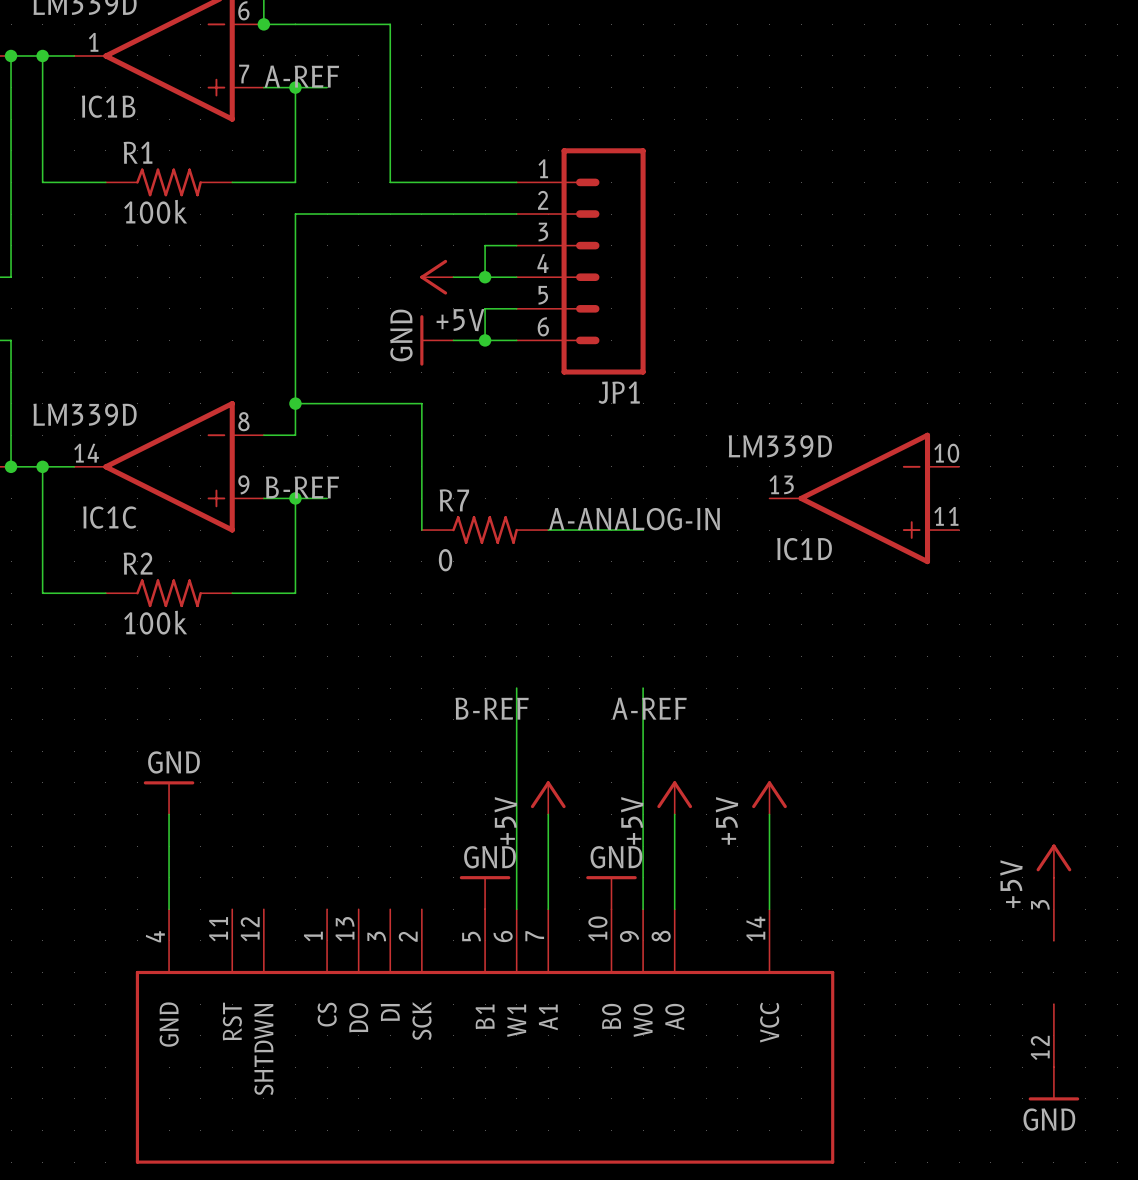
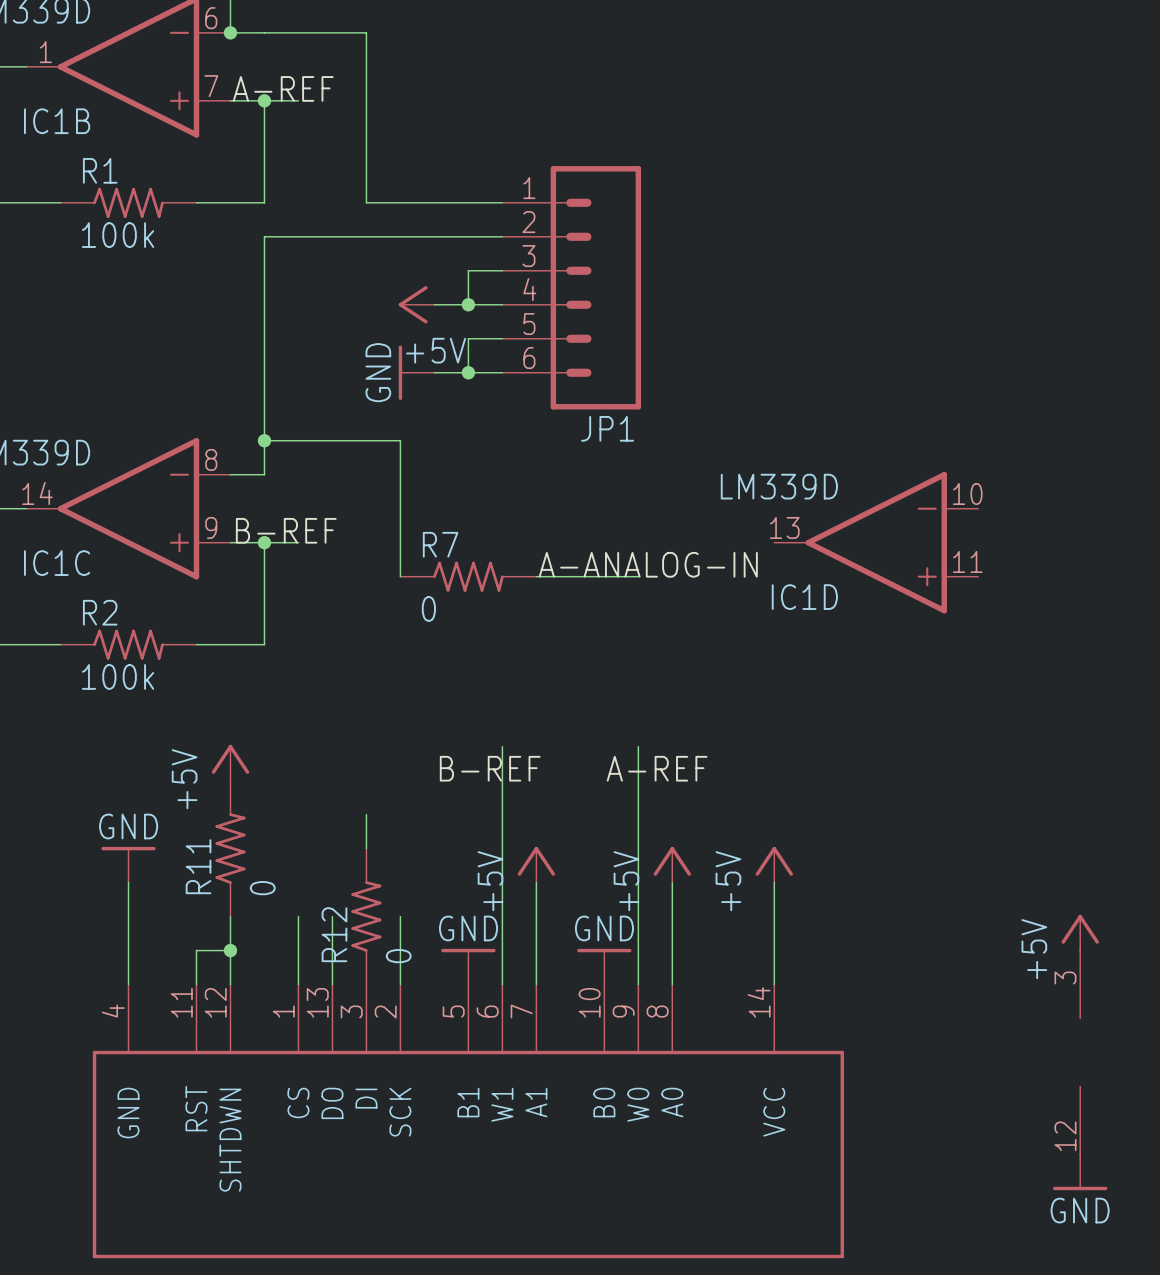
power symbol: none -> +5V (230, 762)
wire: none -> (366, 814) (366, 848)
R11: none -> 0 (230, 848)
wire: none -> (230, 916) (230, 984)
wire: none -> (298, 916) (298, 984)
wire: none -> (332, 916) (332, 984)
R12: none -> 0 (366, 916)
wire: none -> (400, 916) (400, 984)
wire: none -> (230, 950) (196, 950) (196, 984)
junction: none -> (230, 950)

